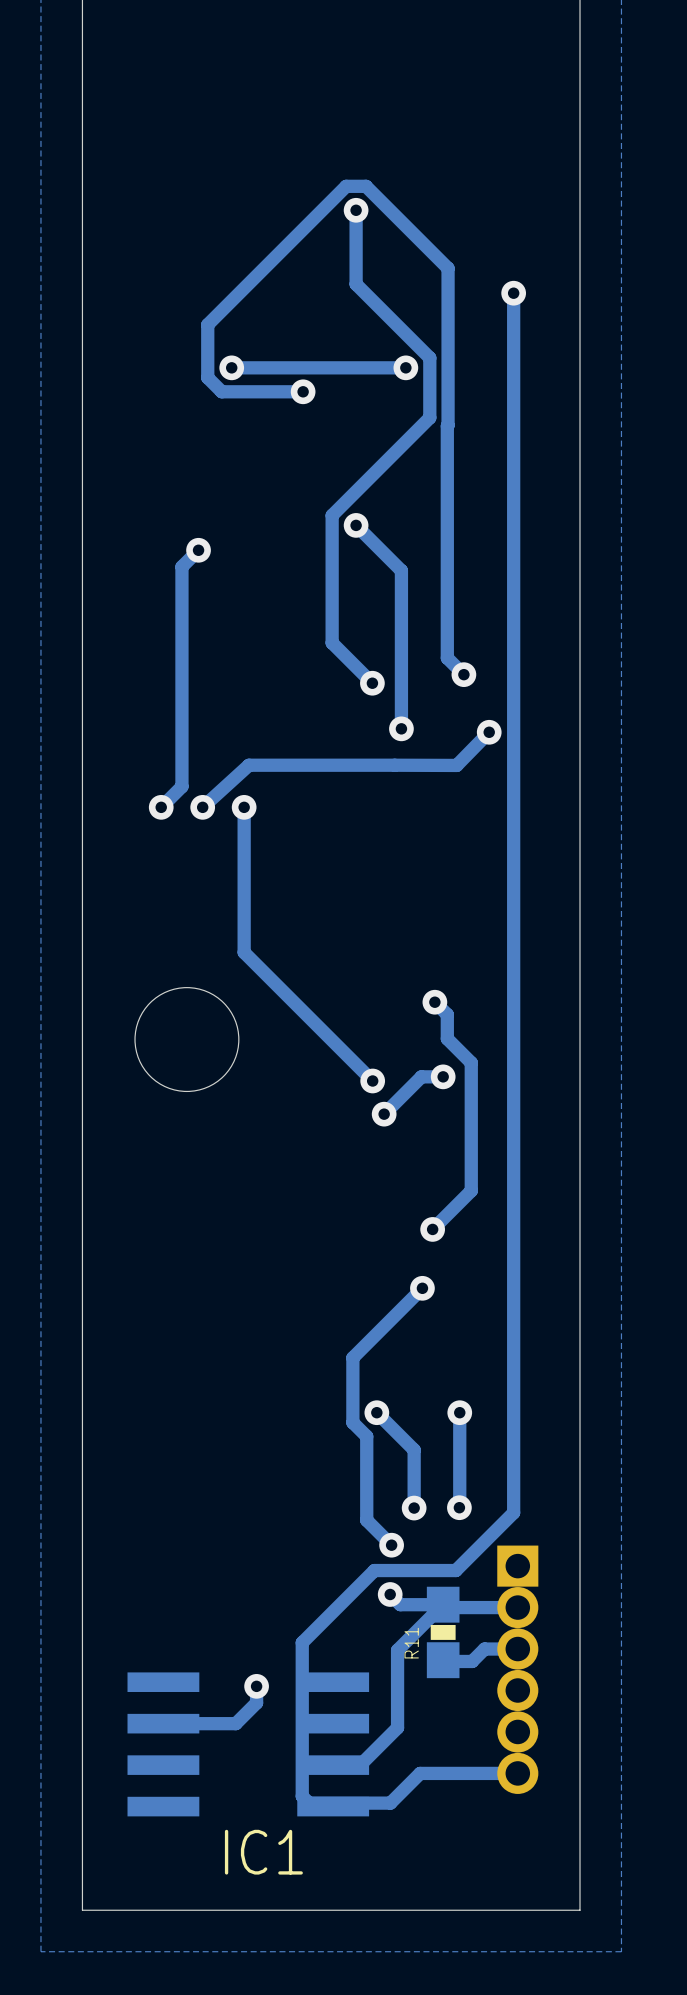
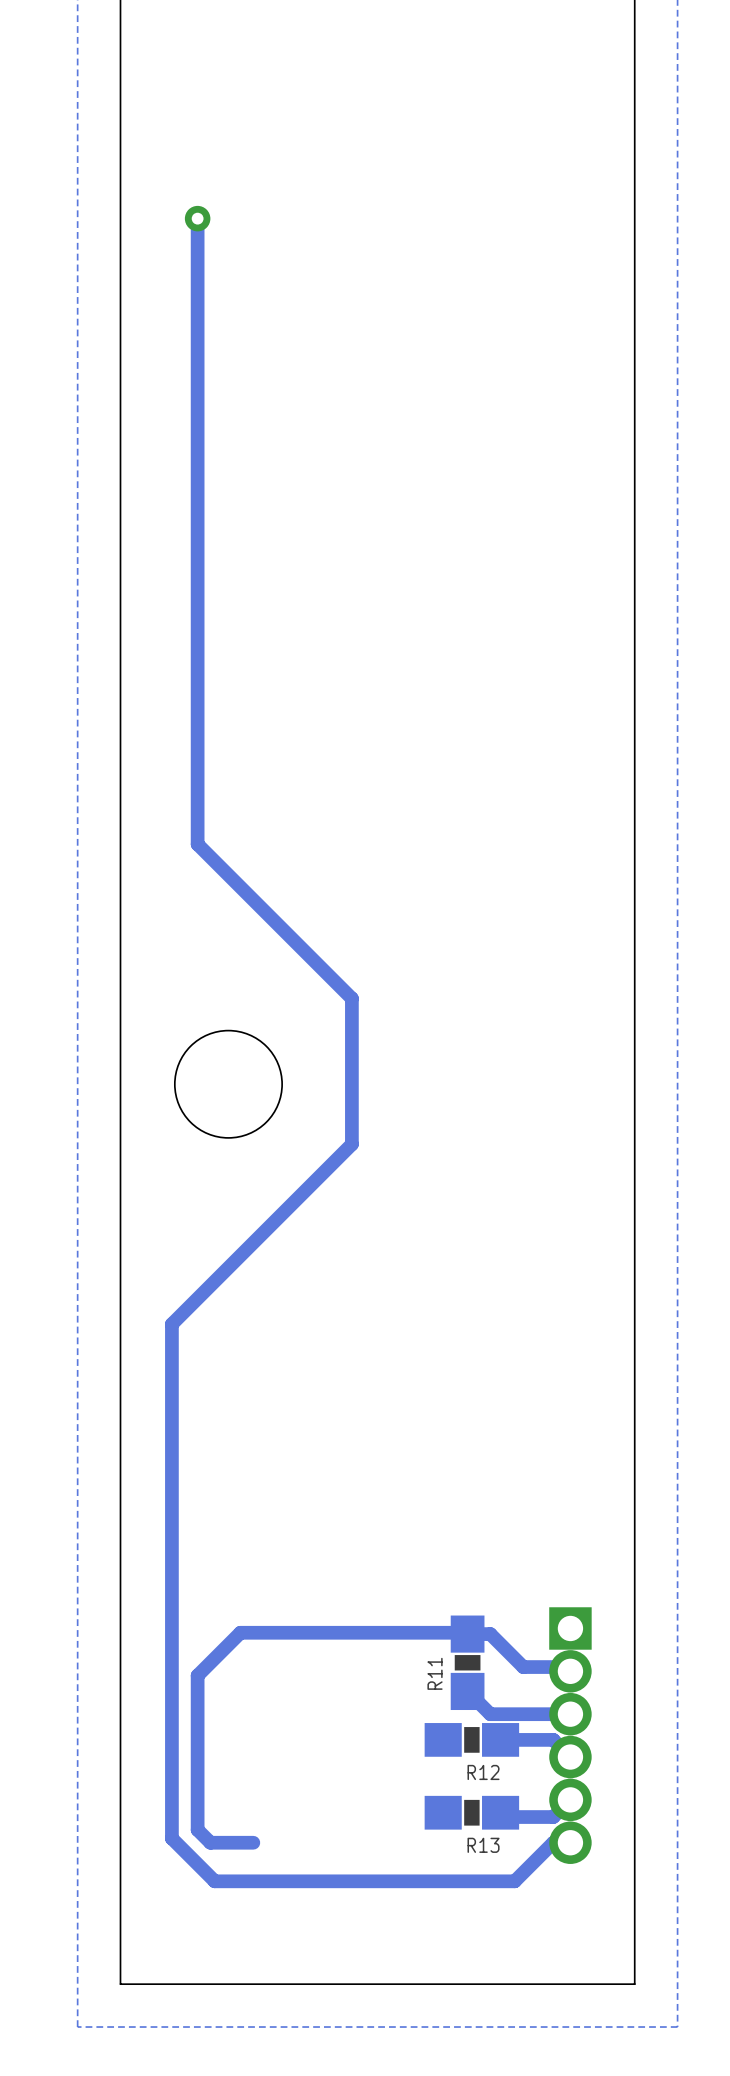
track: none -> (197, 218) (197, 844) (351, 998) (351, 1144) (171, 1324) (171, 1838) (214, 1881) (514, 1881) (553, 1842)
via: none -> (197, 218)
track: (356, 210) (356, 284) (429, 357) (429, 417) (332, 515) (332, 642) (372, 683) -> none
via: (356, 210) -> none
track: (513, 293) (513, 1512) (455, 1570) (417, 1570) -> none
via: (513, 293) -> none
via: (231, 367) -> none
track: (405, 367) (231, 367) -> none
via: (405, 367) -> none
track: (303, 391) (221, 391) (207, 377) (207, 324) (346, 186) (366, 186) (448, 268) (447, 658) (463, 674) -> none
via: (303, 391) -> none
track: (356, 525) (401, 570) (401, 728) -> none
via: (356, 525) -> none
track: (198, 550) (181, 566) (181, 786) (161, 807) -> none
via: (198, 550) -> none
via: (463, 674) -> none
via: (372, 683) -> none
via: (401, 728) -> none
track: (489, 732) (456, 765) (248, 765) (202, 807) -> none
via: (489, 732) -> none
via: (161, 807) -> none
via: (202, 807) -> none
track: (244, 807) (244, 952) (372, 1080) -> none
via: (244, 807) -> none
track: (434, 1002) (447, 1014) (447, 1038) (471, 1062) (471, 1190) (432, 1229) -> none
via: (434, 1002) -> none
track: (443, 1076) (421, 1076) (384, 1114) -> none
via: (443, 1076) -> none
via: (372, 1080) -> none
via: (384, 1114) -> none
via: (432, 1229) -> none
track: (422, 1288) (352, 1357) (352, 1422) (366, 1436) (366, 1520) (391, 1545) -> none
via: (422, 1288) -> none
track: (376, 1412) (414, 1450) (414, 1508) -> none
via: (376, 1412) -> none
track: (459, 1412) (459, 1507) -> none
via: (459, 1412) -> none
via: (459, 1507) -> none
via: (414, 1508) -> none
via: (391, 1545) -> none
track: (374, 1570) (302, 1642) (302, 1796) (309, 1803) (390, 1803) (420, 1773) (501, 1773) -> (422, 1633) (240, 1632) (197, 1675) (197, 1829) (210, 1842) (253, 1842)
track: (390, 1594) (400, 1604) (443, 1604) -> none
via: (390, 1594) -> none
track: (443, 1604) (446, 1607) (517, 1607) -> (466, 1632) (490, 1634) (523, 1667) (566, 1667) (570, 1671)
track: (443, 1604) (397, 1650) (397, 1727) (360, 1765) (333, 1765) -> none
R11 position: (443, 1632) -> (467, 1662)
track: (484, 1649) (472, 1661) (443, 1660) -> (536, 1714) (490, 1714) (467, 1691)
R12: none -> (471, 1739)
track: none -> (500, 1739) (553, 1739) (570, 1757)
track: (256, 1686) (256, 1702) (235, 1723) (163, 1723) -> none
via: (256, 1686) -> none
track: none -> (570, 1799) (553, 1817) (504, 1817) (500, 1812)
IC1: (248, 1744) -> none
R13: none -> (471, 1812)

